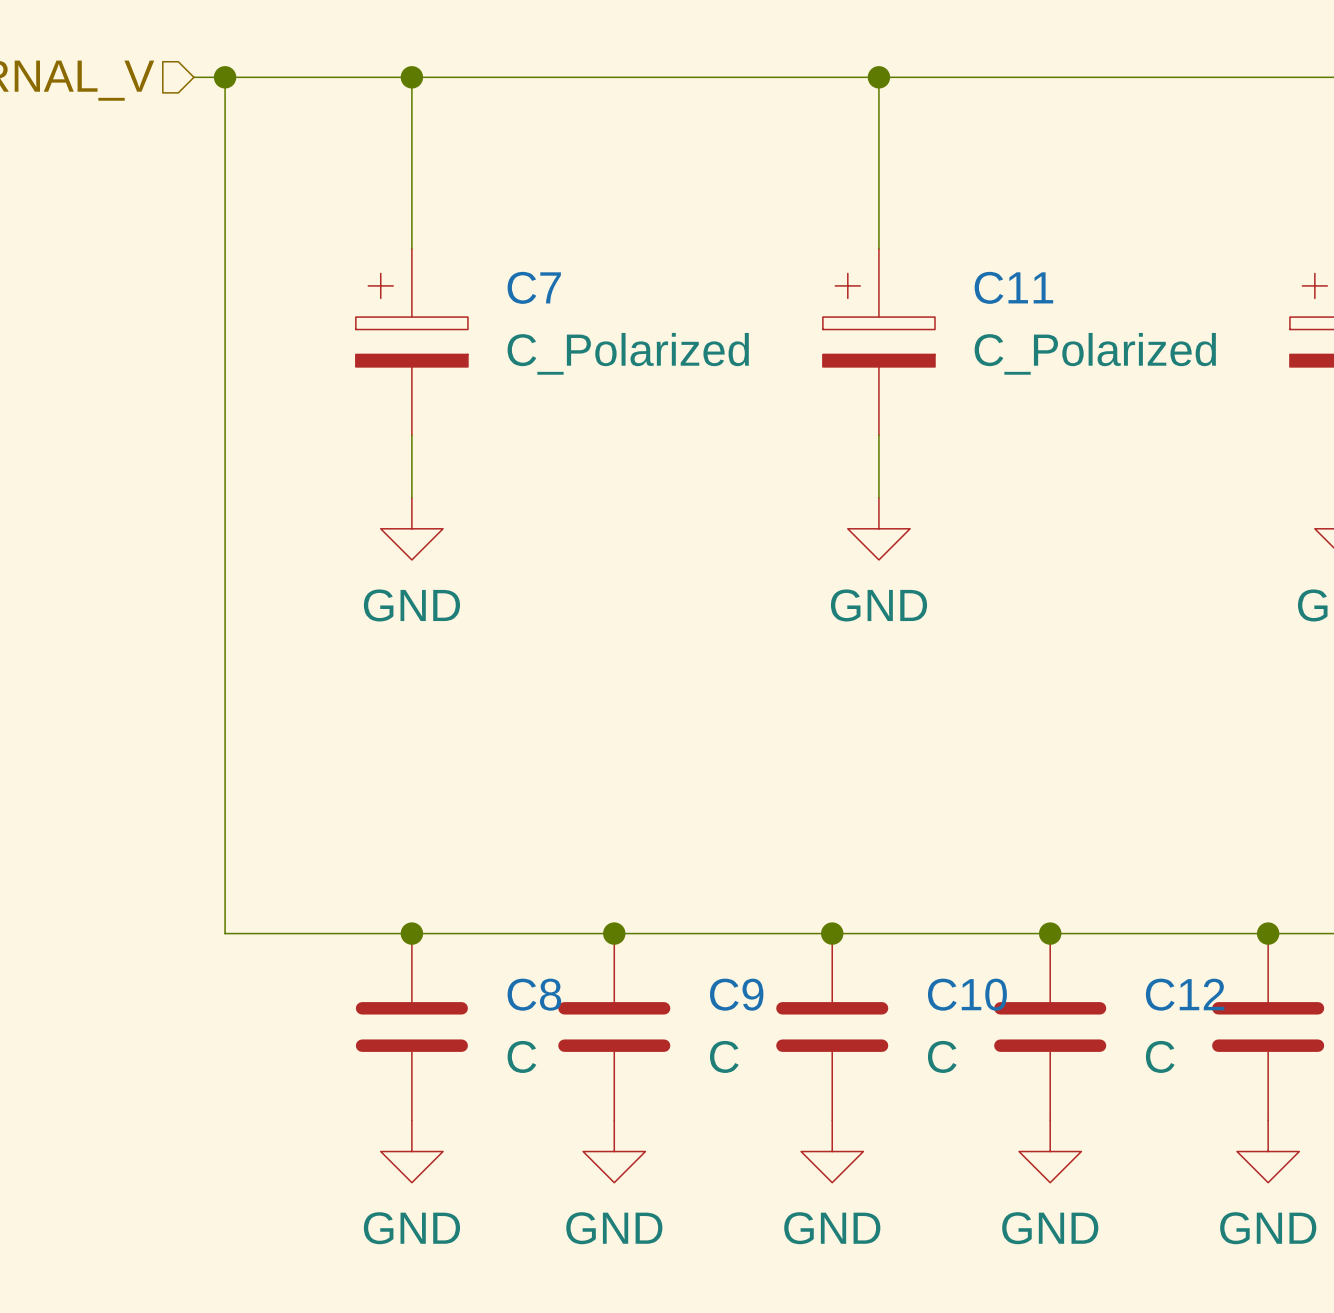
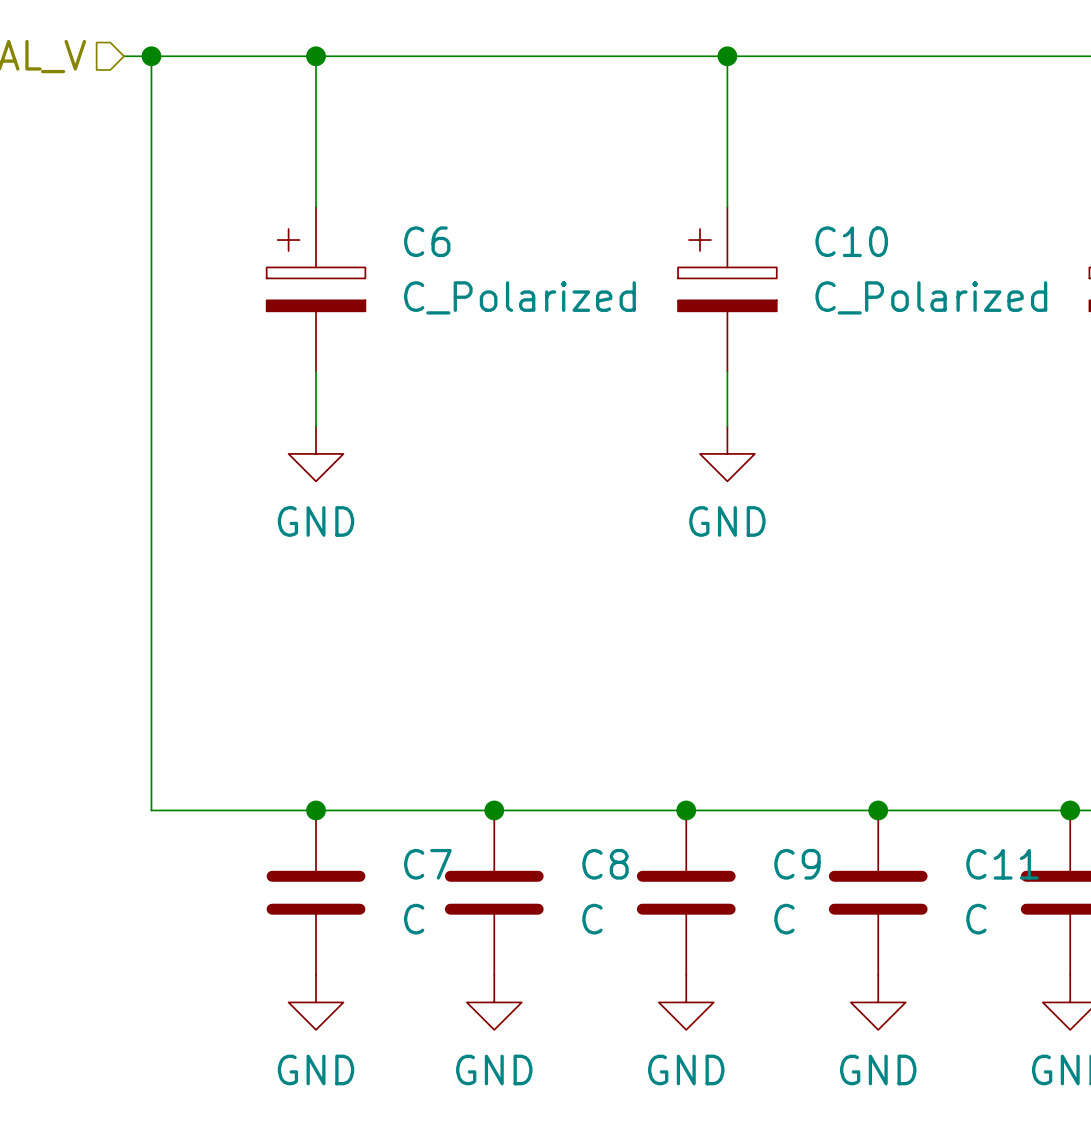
C7 name: C7 (534, 287) -> C6 (427, 241)
C11 name: C11 (1013, 287) -> C10 (851, 241)
C8 name: C8 (534, 994) -> C7 (427, 864)
C9 name: C9 (736, 994) -> C8 (605, 864)
C10 name: C10 (967, 994) -> C9 (797, 864)
C12 name: C12 (1185, 994) -> C11 (1002, 864)

